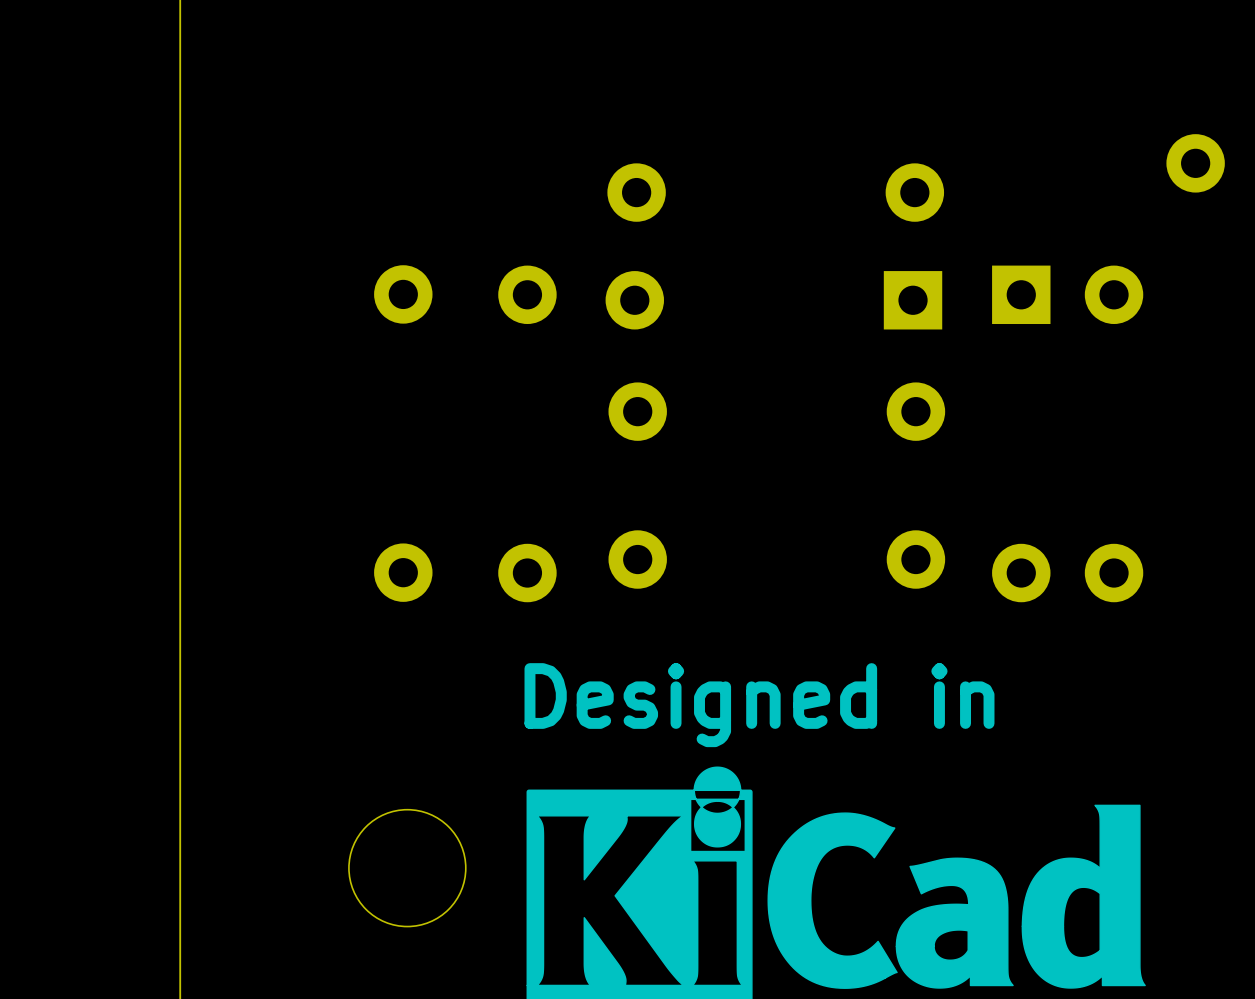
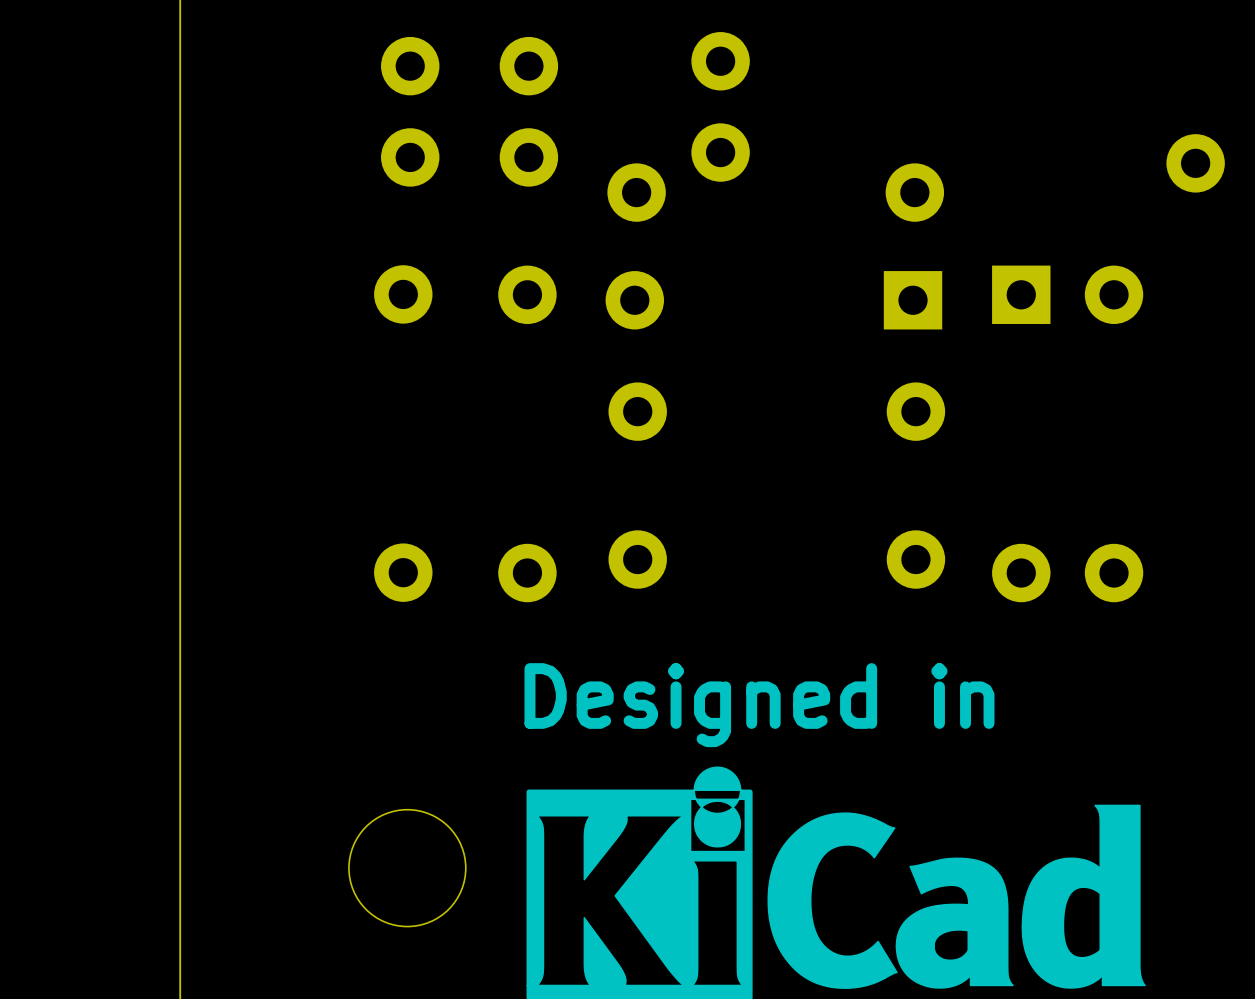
part: none -> (720, 106)
part: none -> (410, 111)
part: none -> (528, 111)

